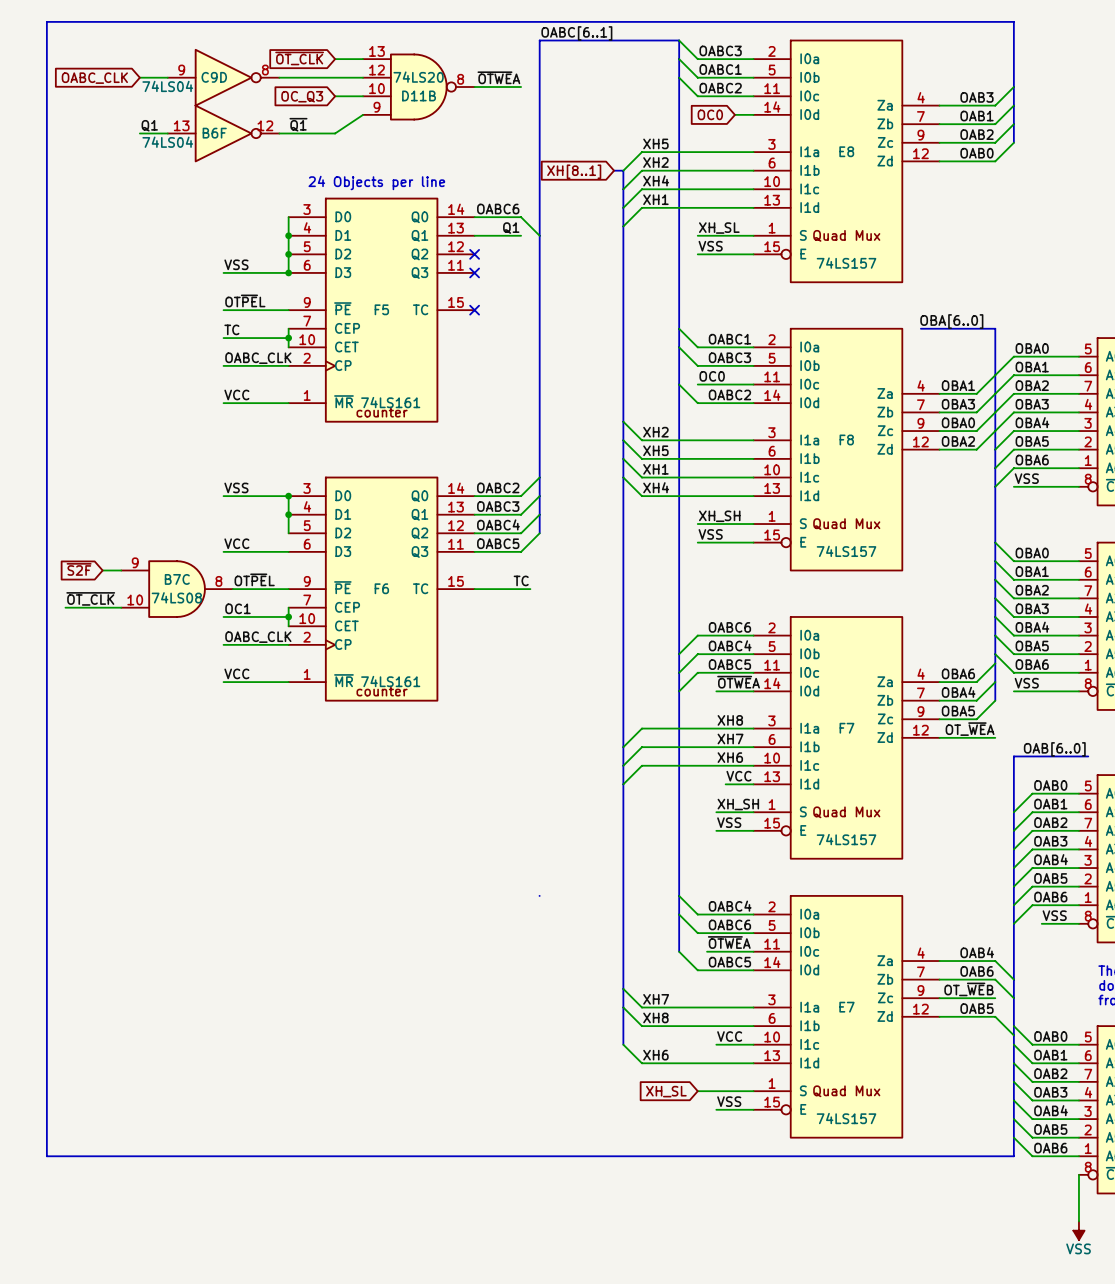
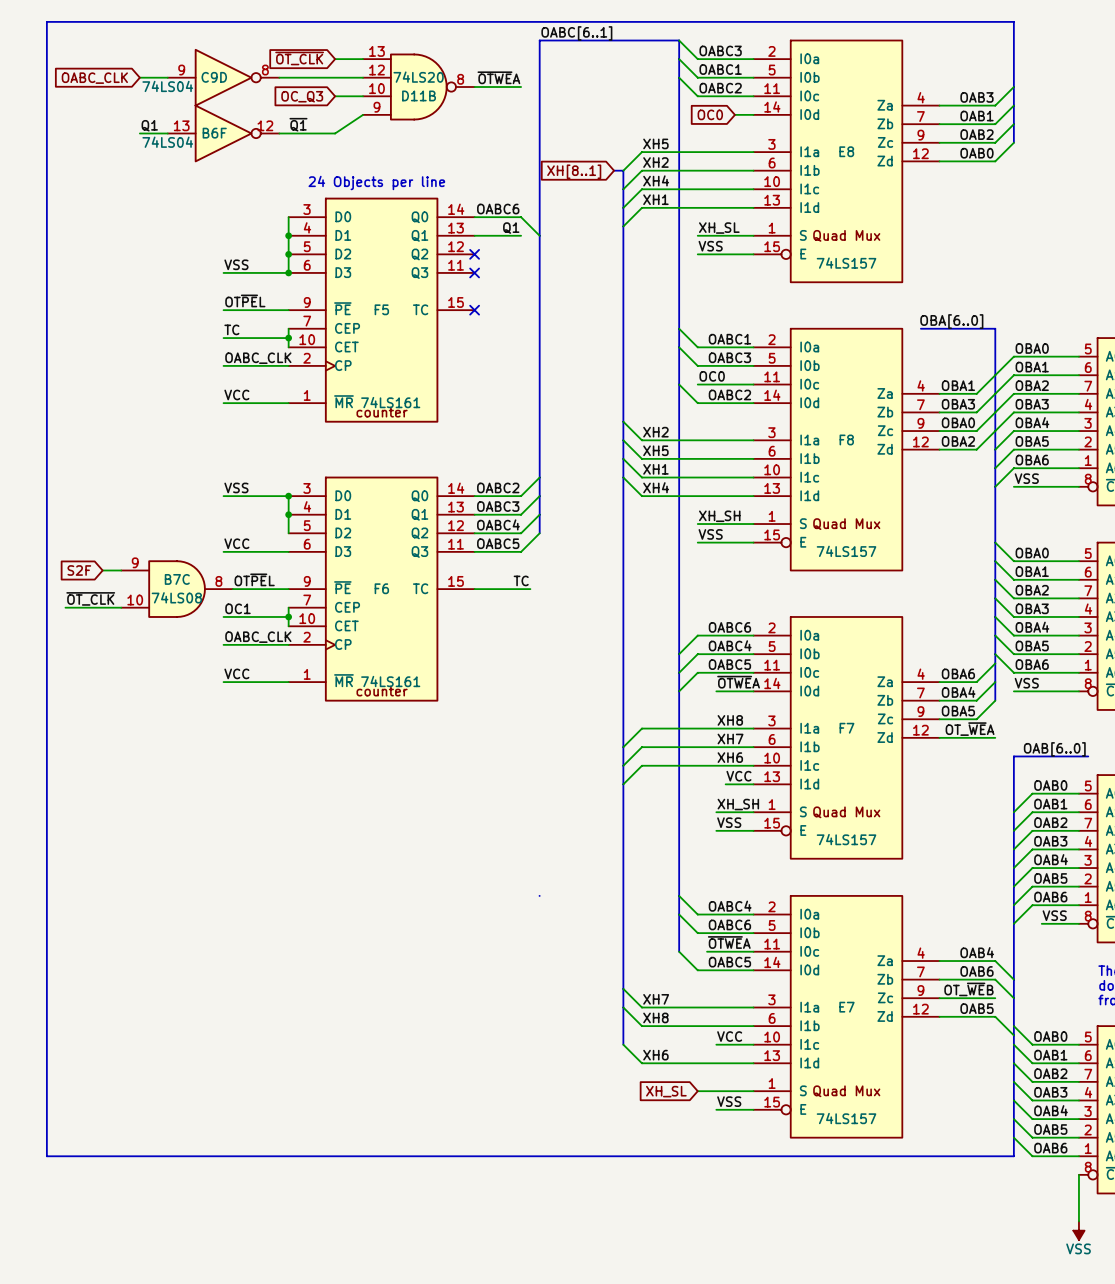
global label: ~{S2F} (79, 569) -> S2F (79, 570)

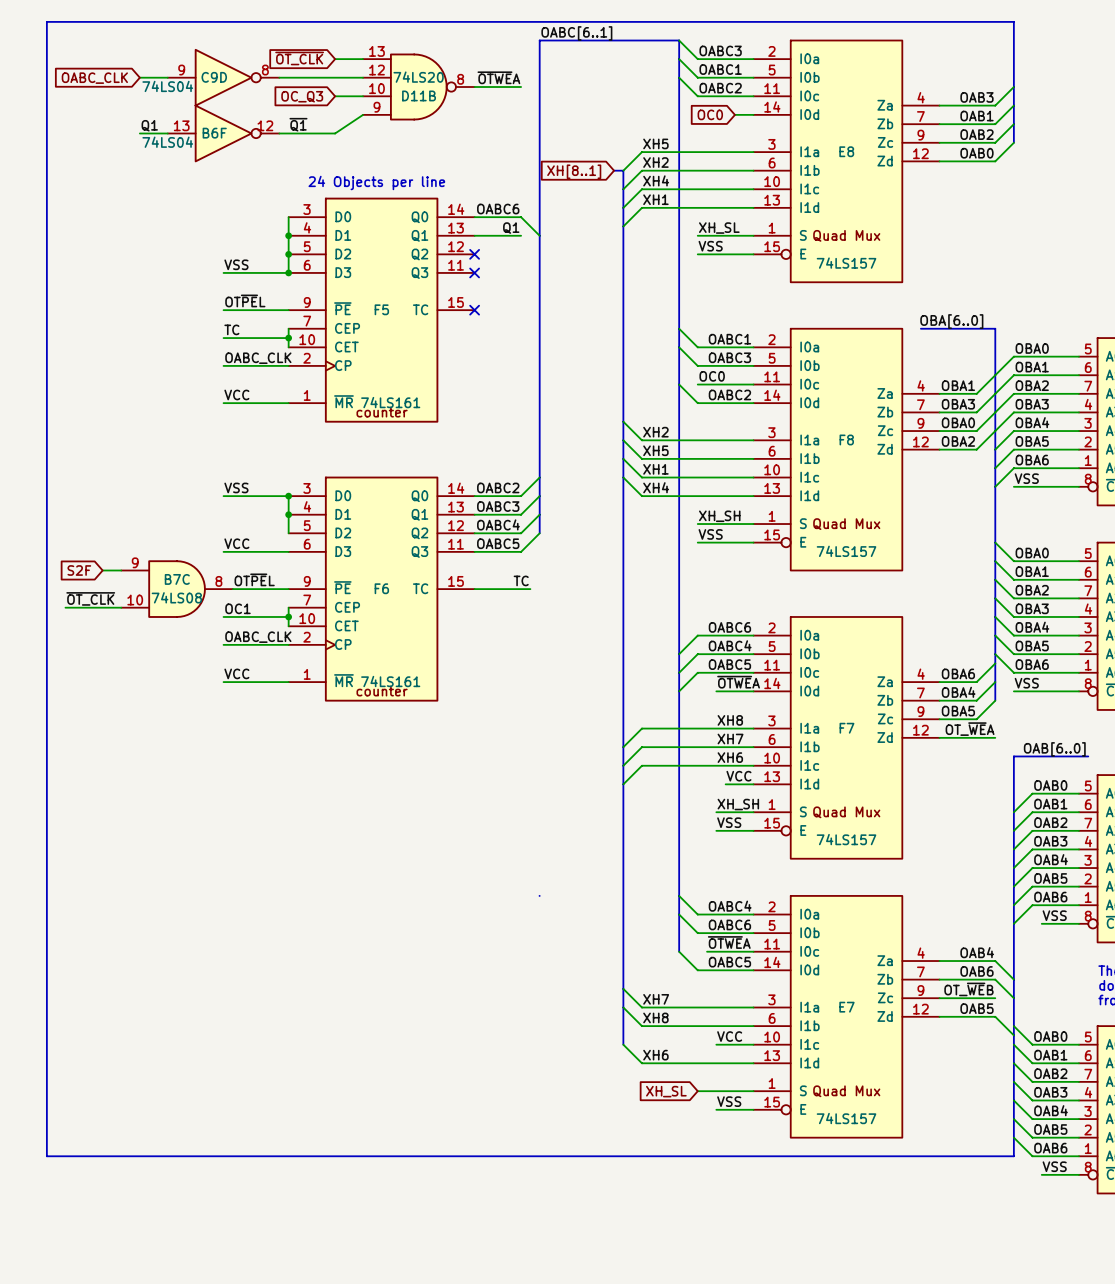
label: none -> VSS (1054, 1166)
wire: (1078, 1174) (1078, 1221) -> (1078, 1174) (1041, 1174)
power symbol: VSS (1078, 1230) -> none

